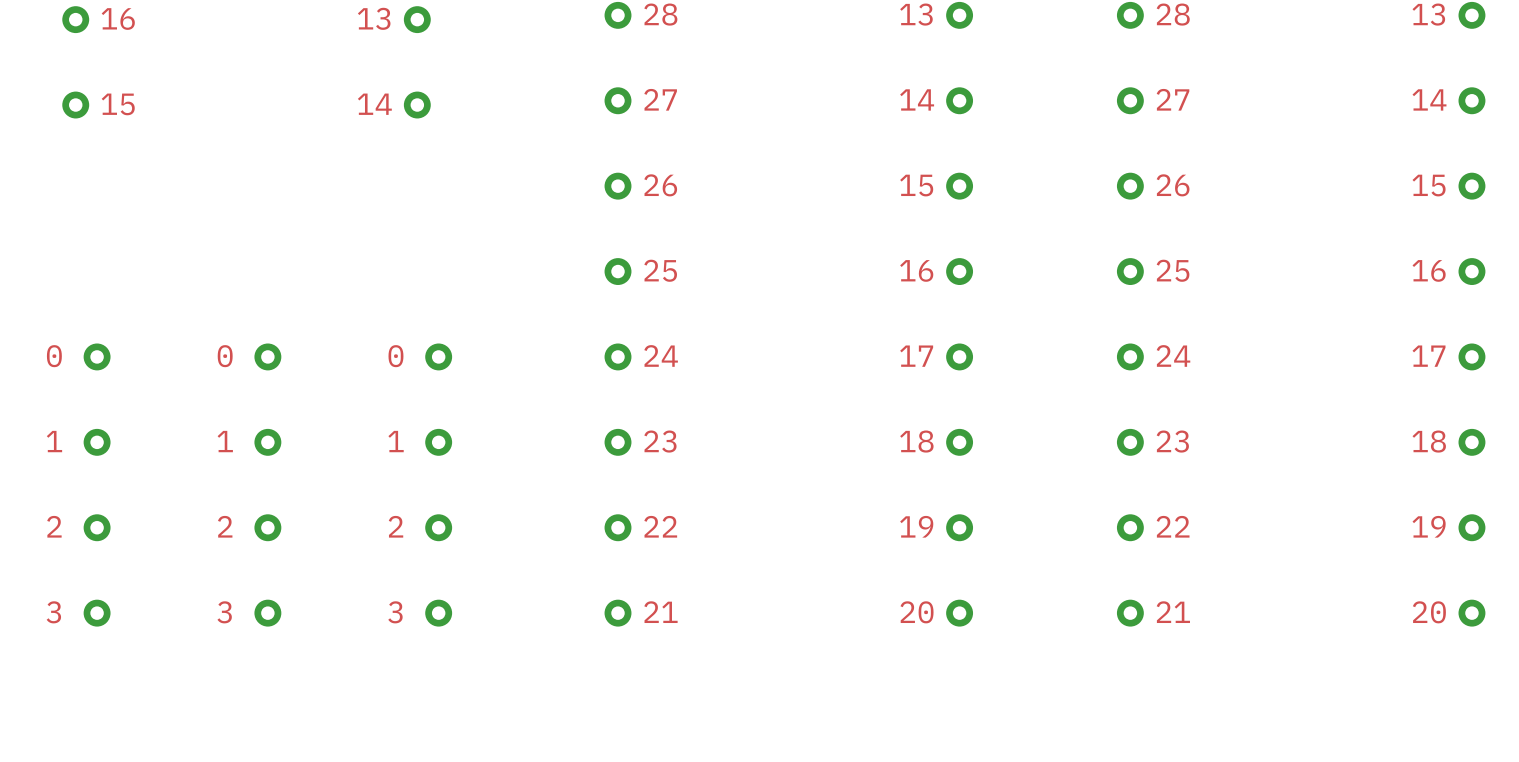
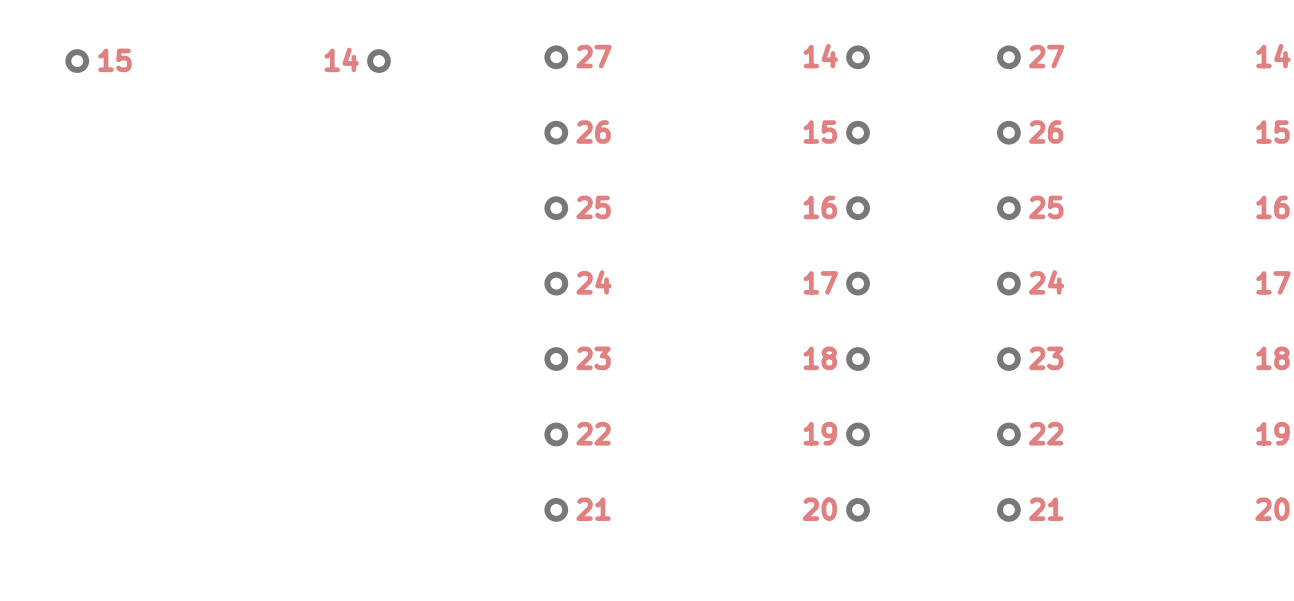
text: 0 (54, 356) -> none
via: (97, 356) -> none
text: 0 (225, 356) -> none
via: (267, 356) -> none
text: 0 (395, 356) -> none
via: (438, 356) -> none
text: 1 (54, 441) -> none
text: 1 (225, 441) -> none
text: 1 (396, 441) -> none
via: (97, 442) -> none
via: (267, 442) -> none
via: (438, 442) -> none
text: 2 (54, 526) -> none
text: 2 (225, 526) -> none
text: 2 (396, 526) -> none
via: (97, 527) -> none
via: (267, 527) -> none
via: (438, 527) -> none
text: 3 (53, 612) -> none
text: 3 (224, 612) -> none
text: 3 (395, 612) -> none
via: (97, 613) -> none
via: (267, 613) -> none
via: (438, 613) -> none

